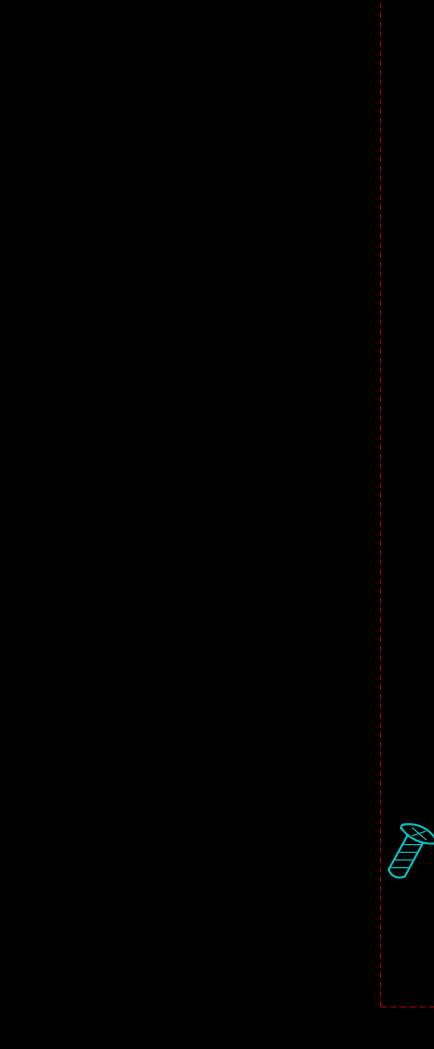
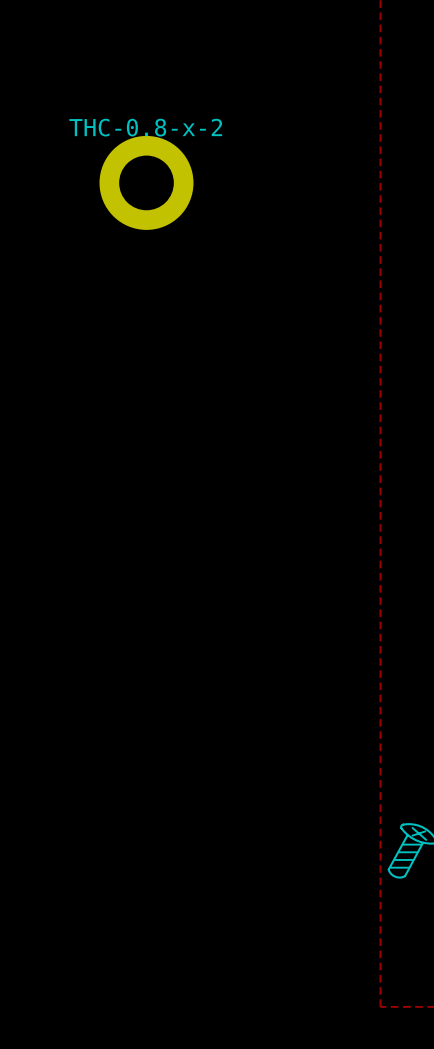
THC-0.8-x-2: none -> (146, 182)

